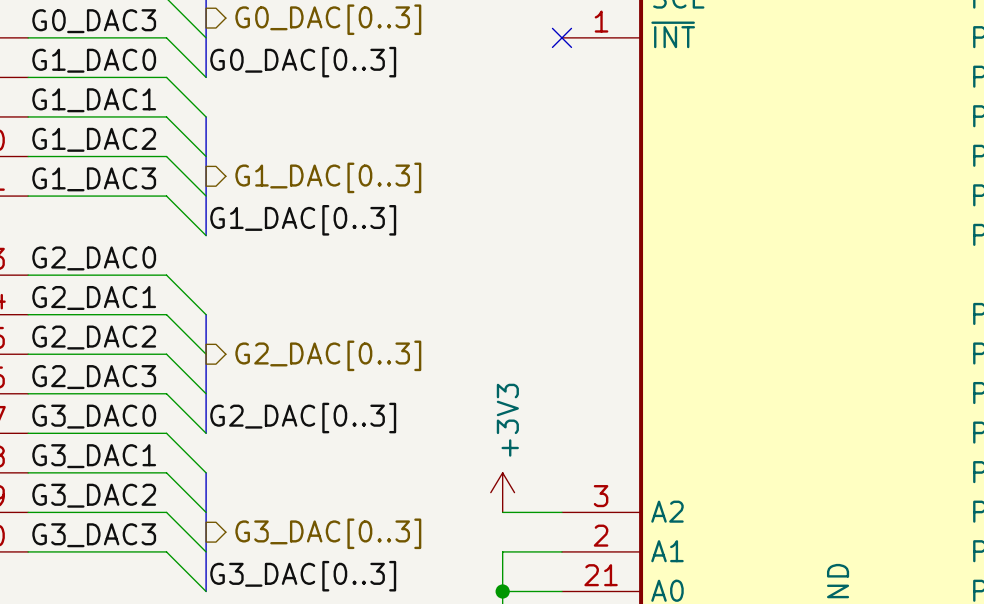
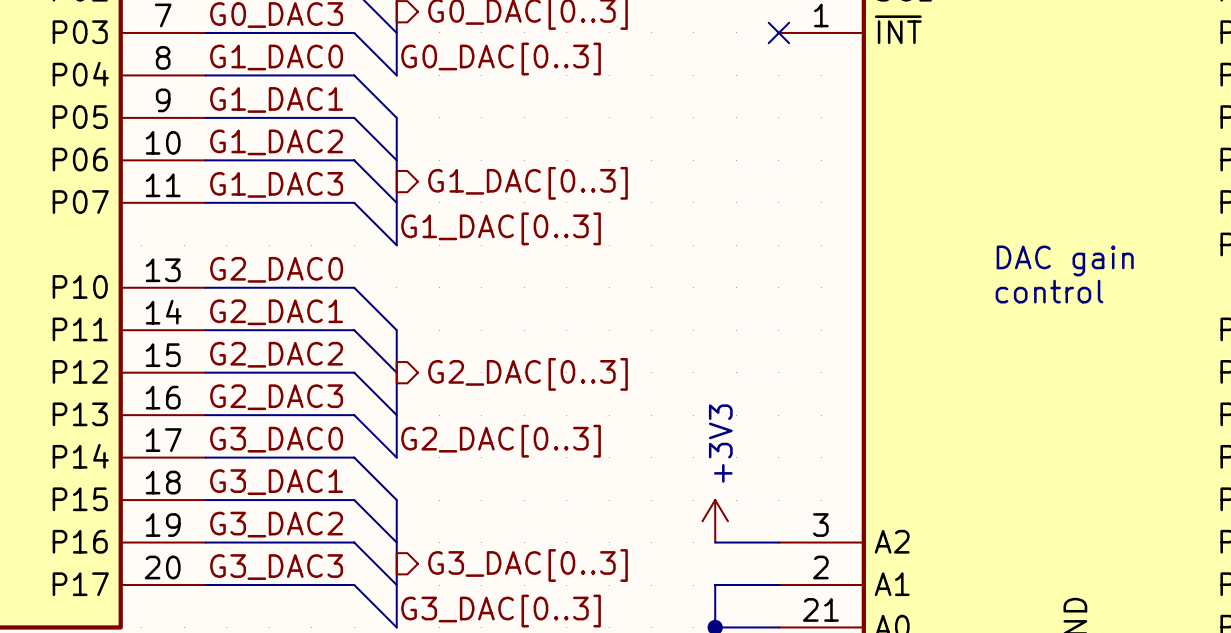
text: none -> DAC gain (1065, 260)
text: none -> control (1049, 291)

